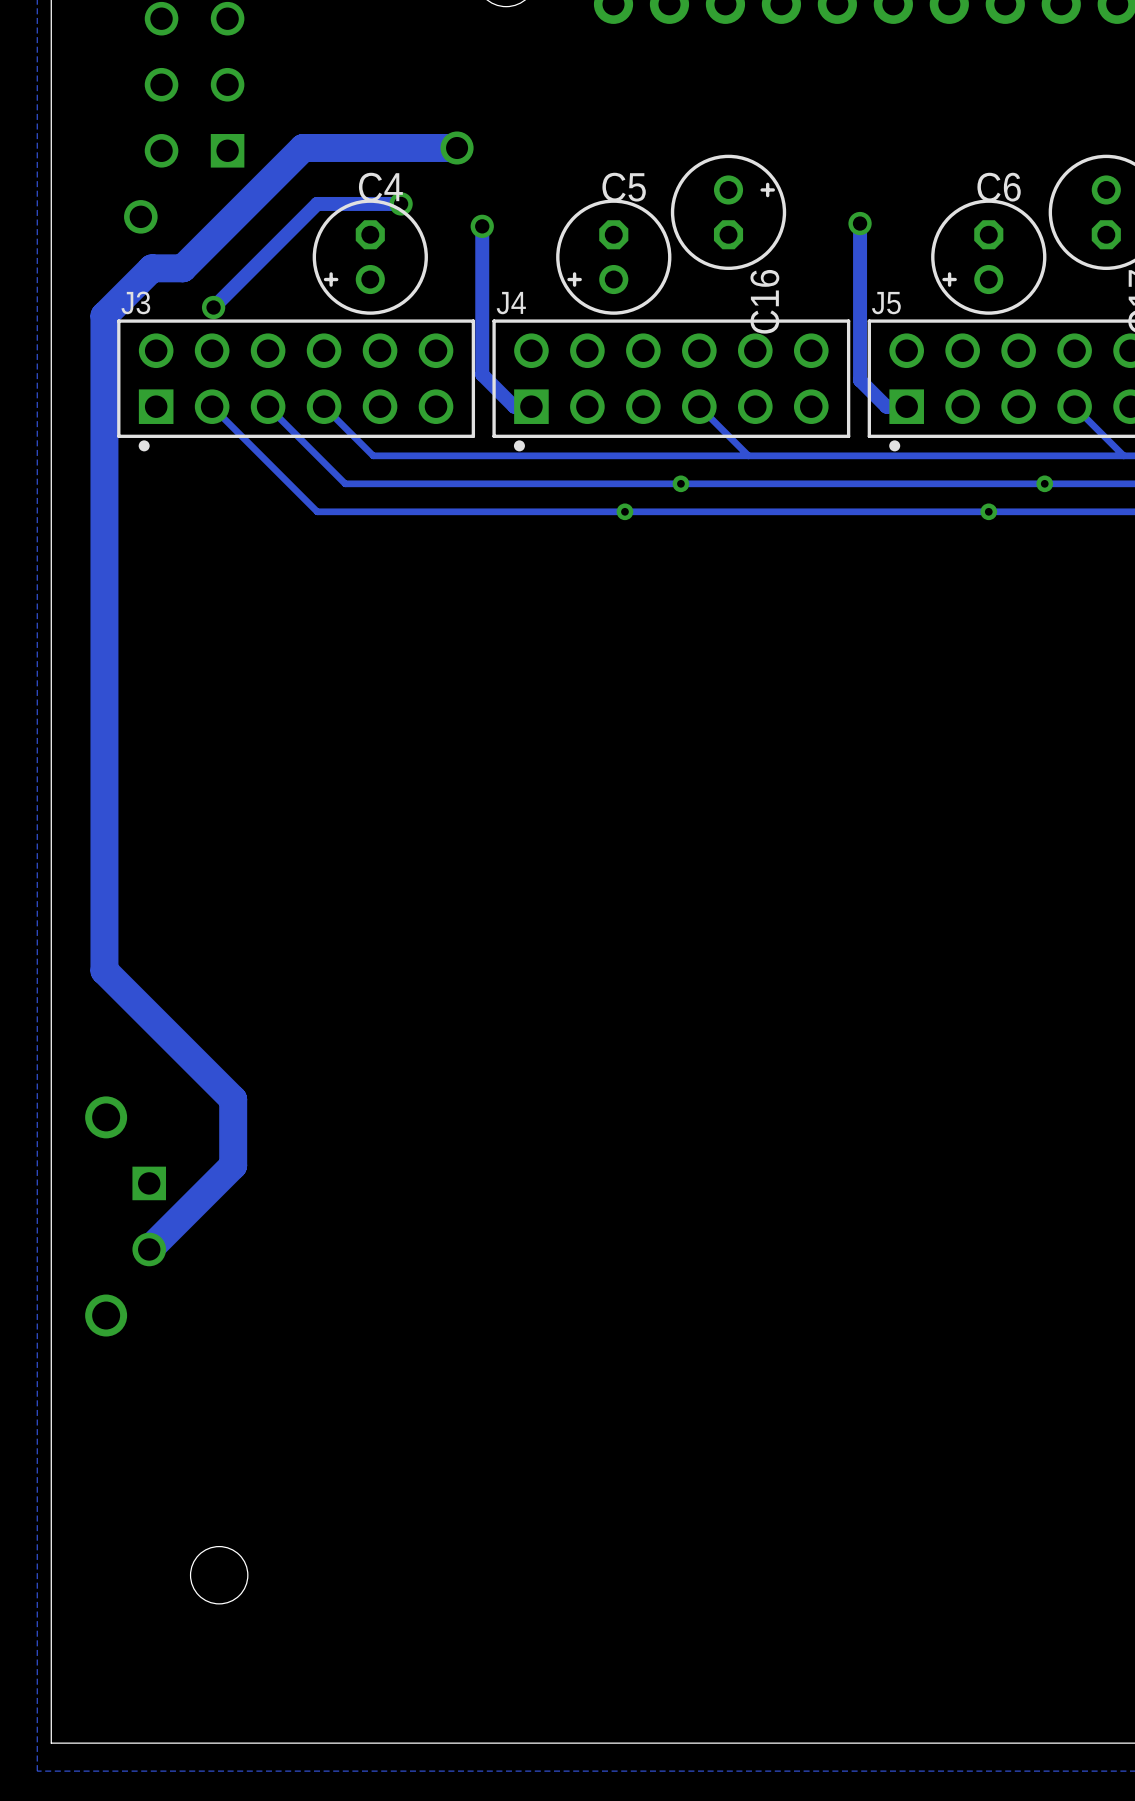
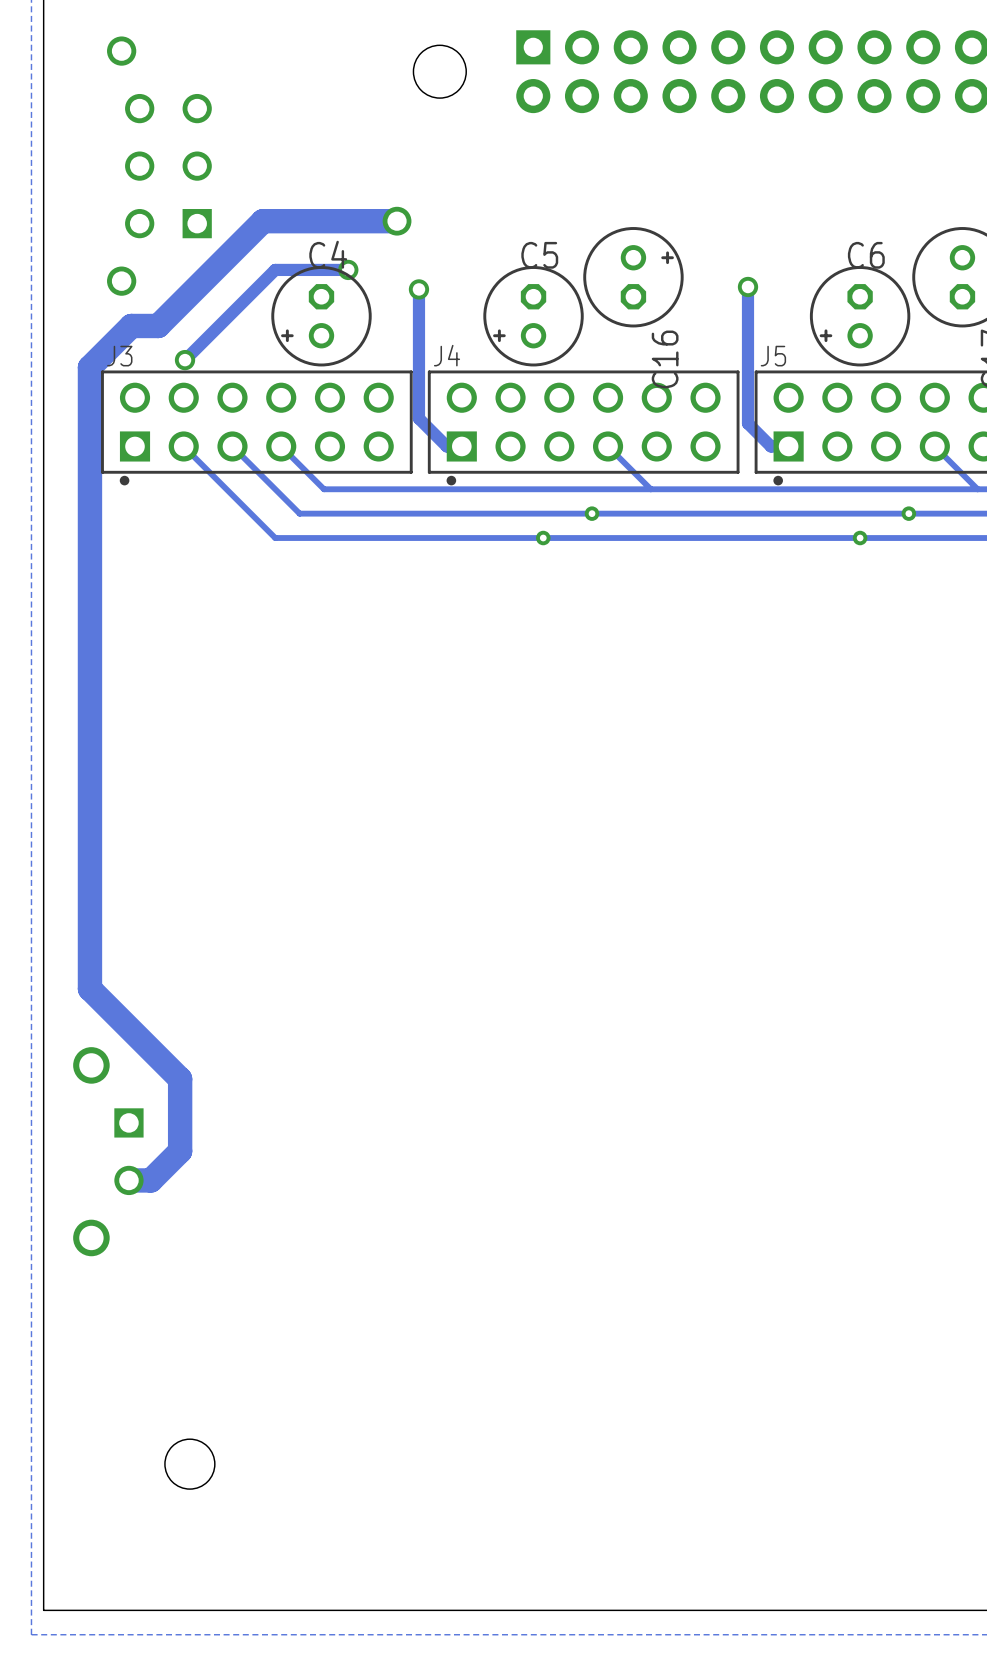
track: (104, 970) (233, 1099) (233, 1165) (149, 1249) -> (89, 937) (89, 988) (180, 1079) (180, 1151) (150, 1180) (128, 1180)

